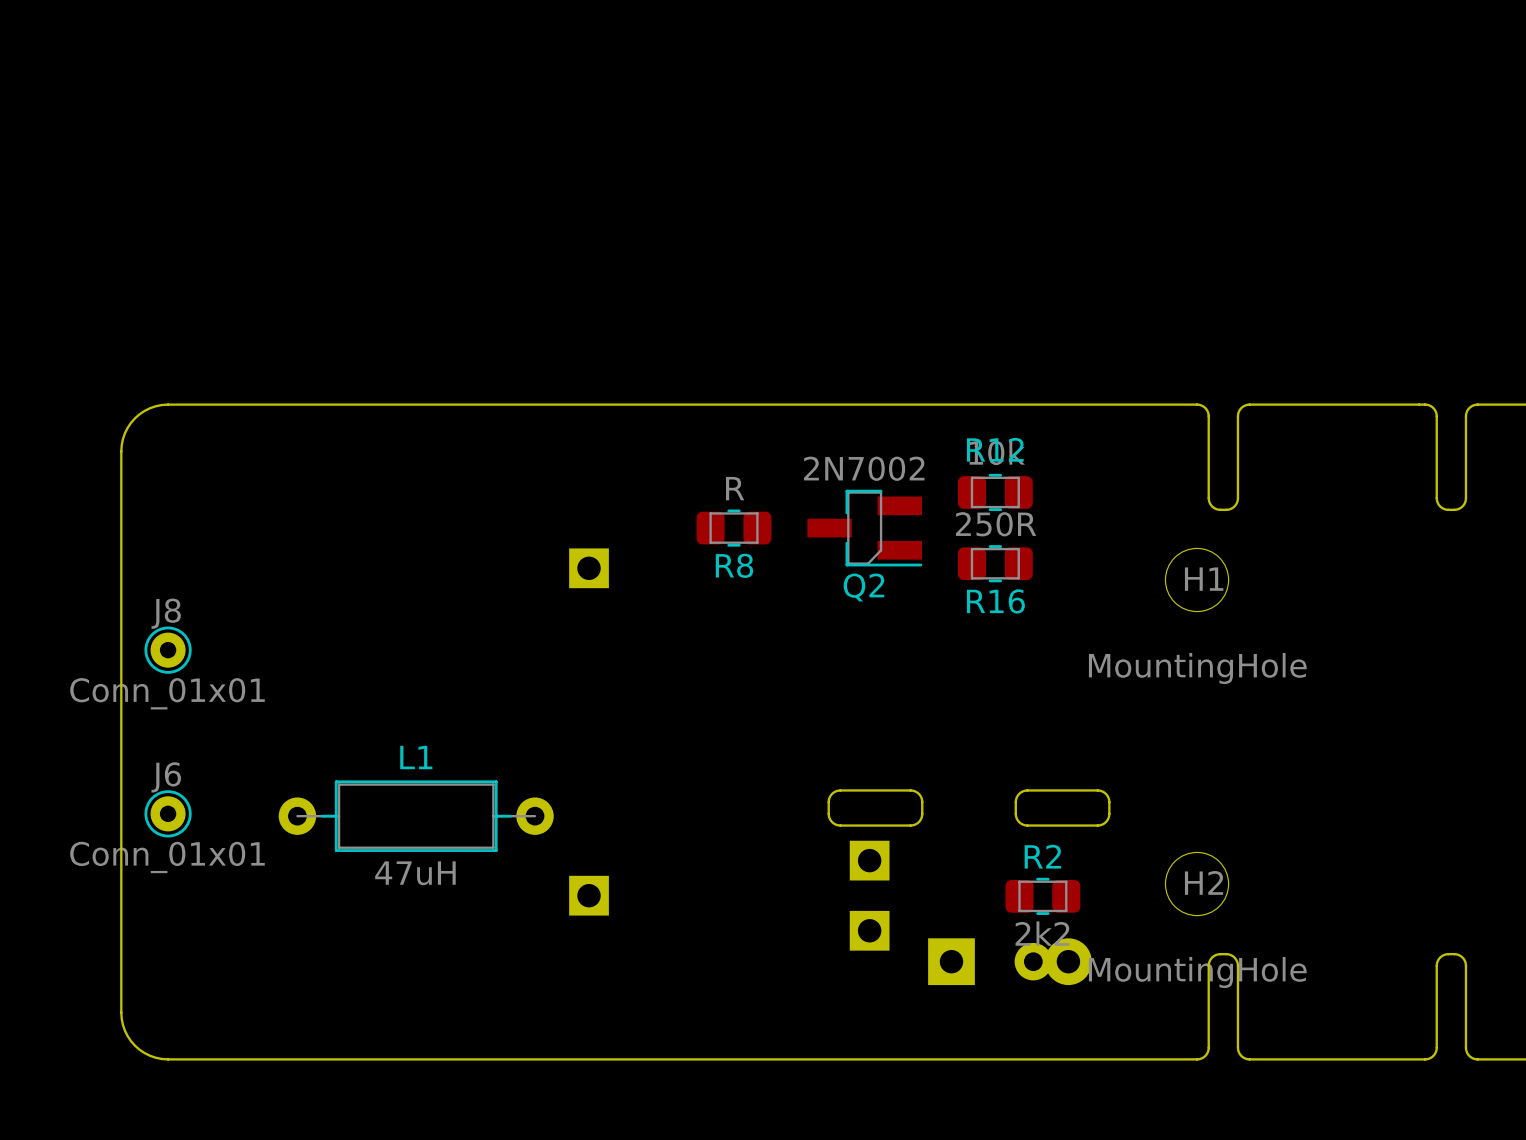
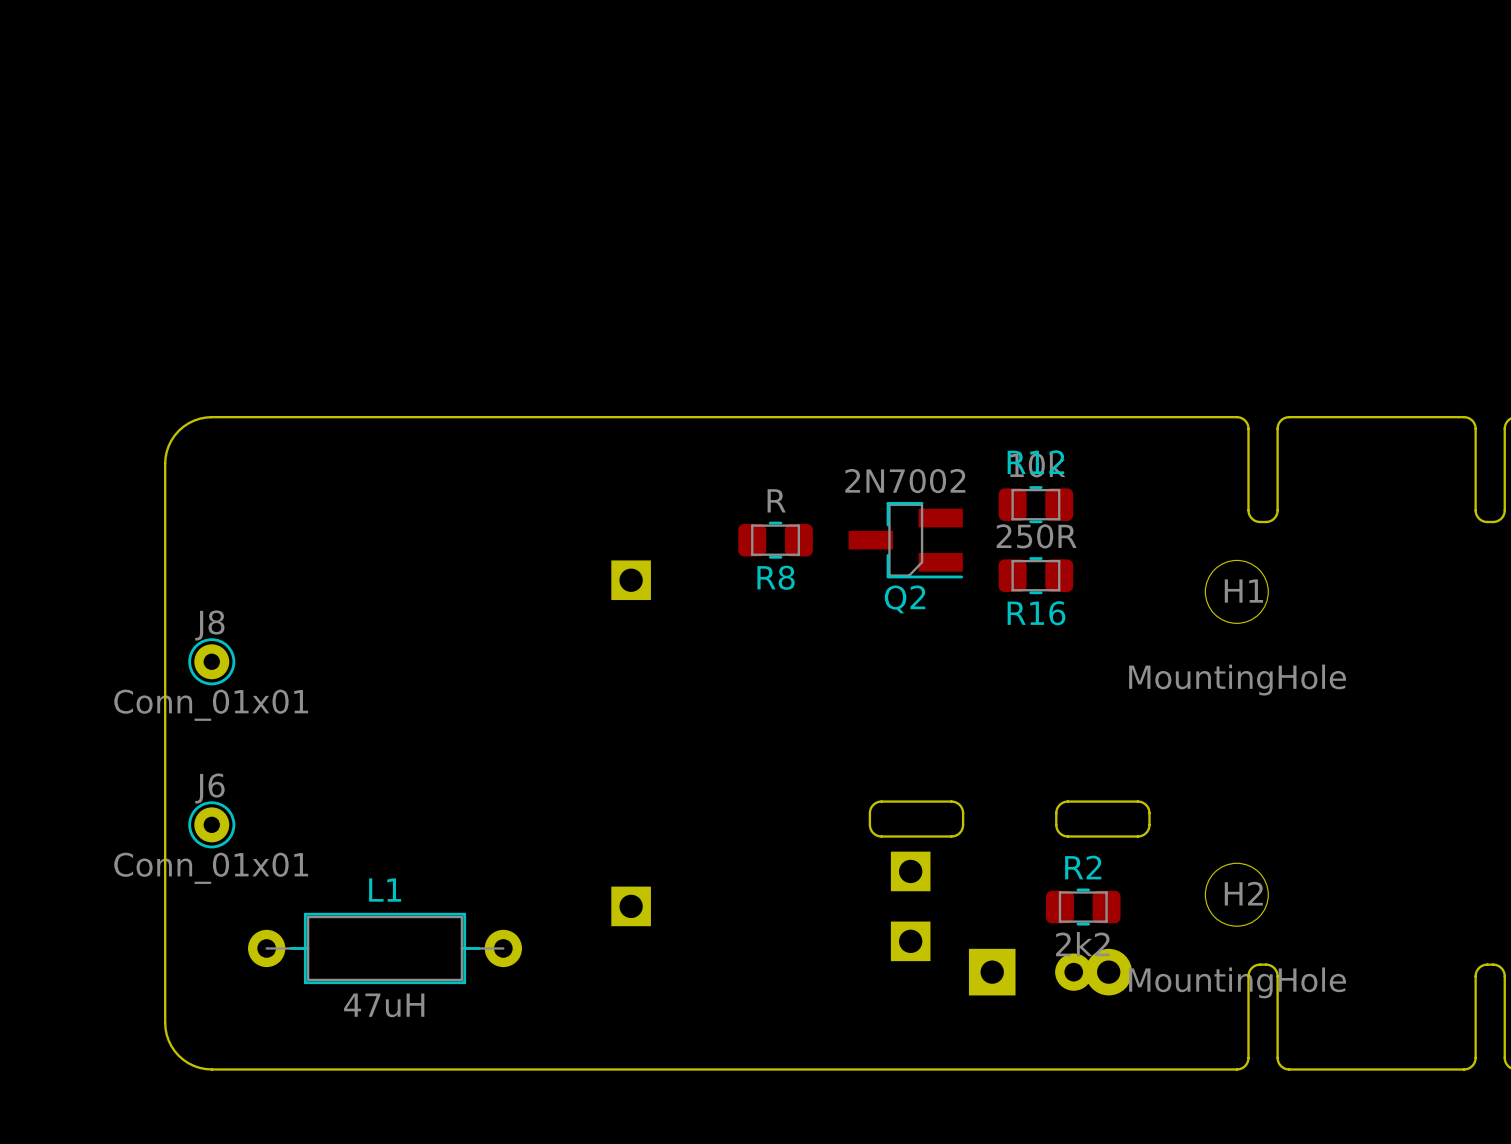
L1 position: (416, 816) -> (385, 948)

